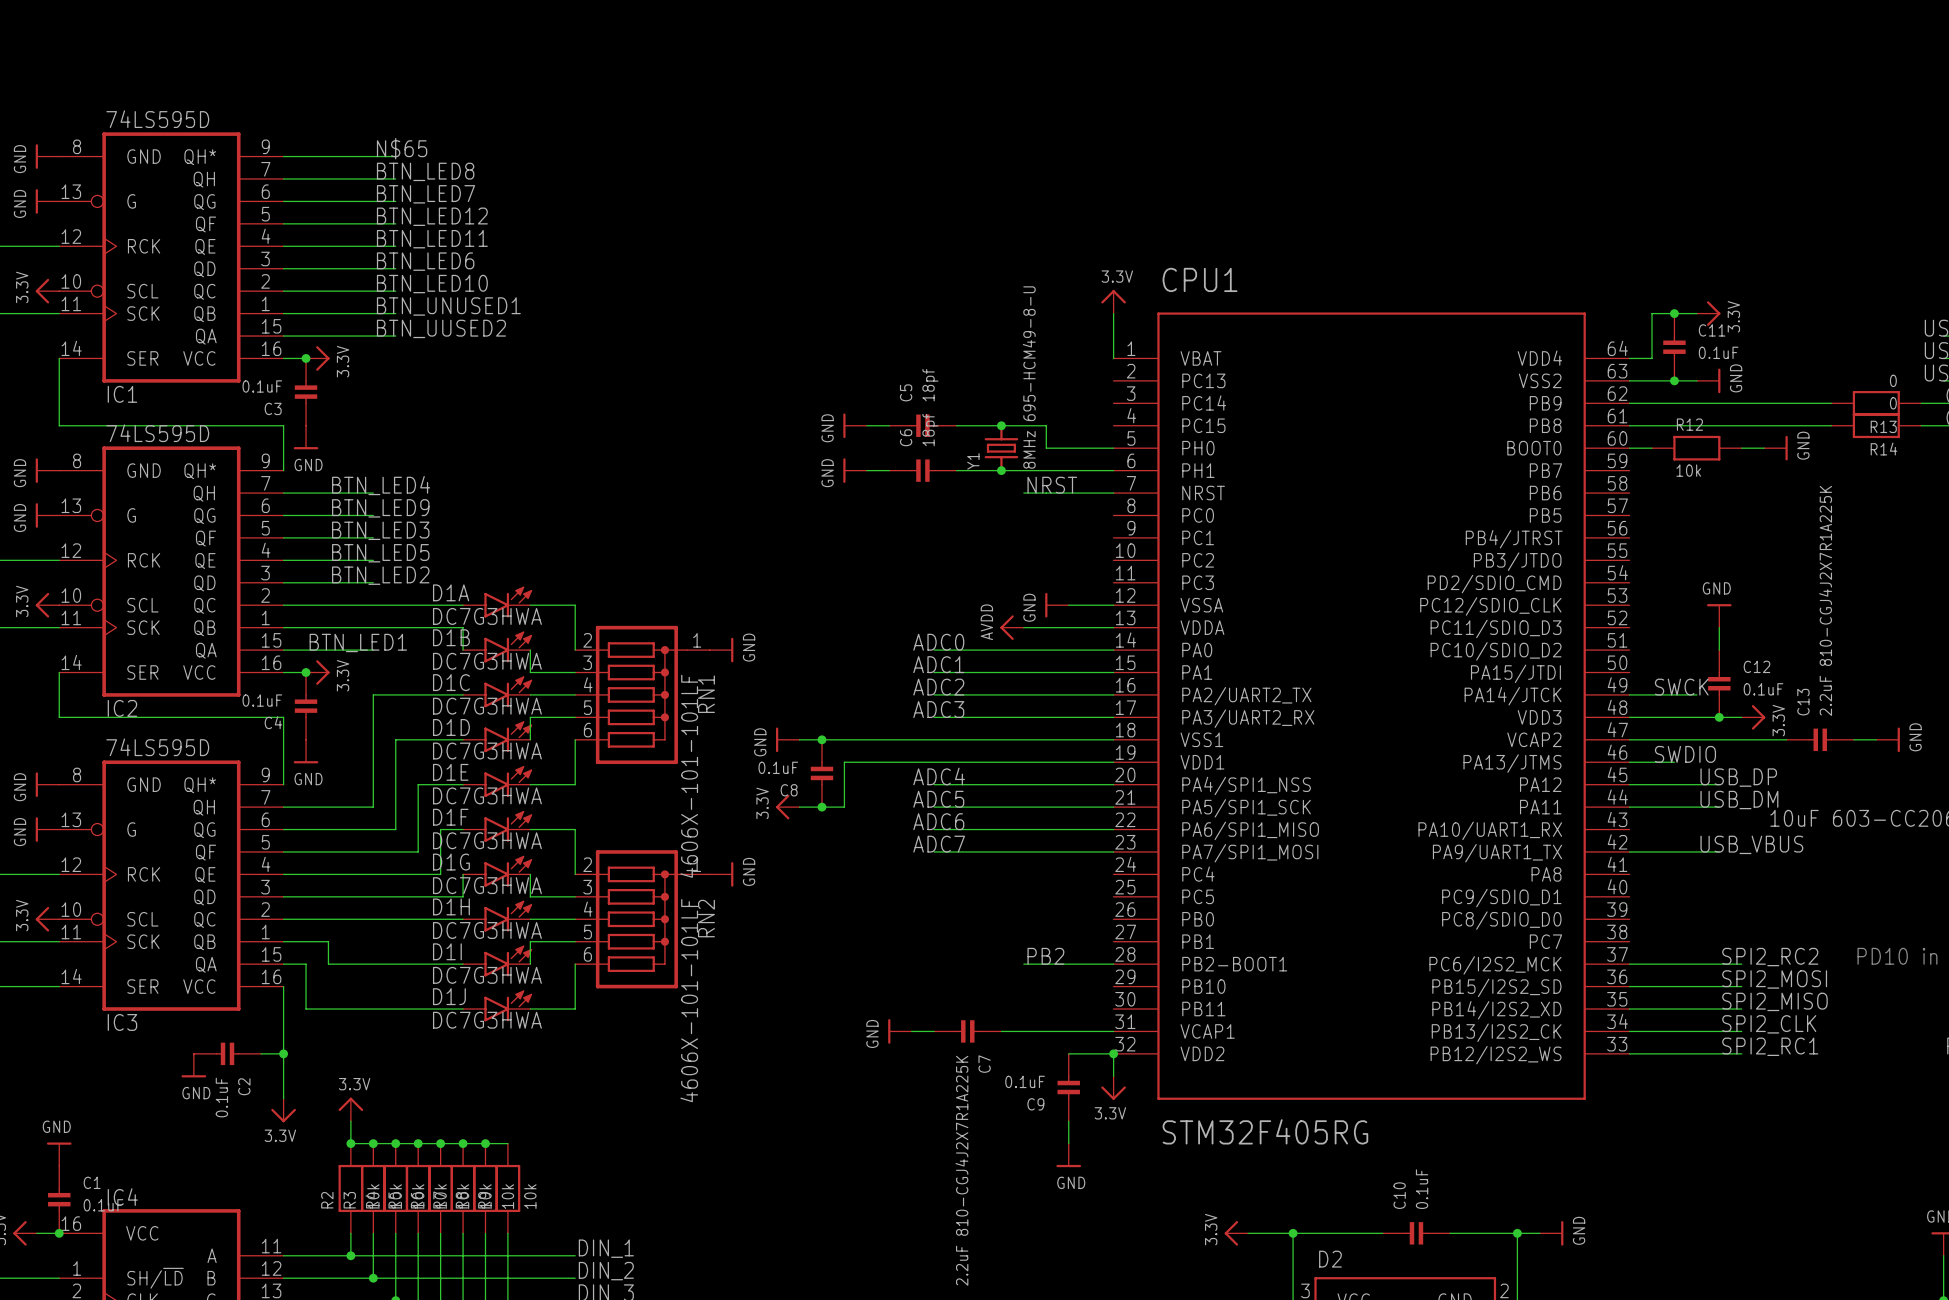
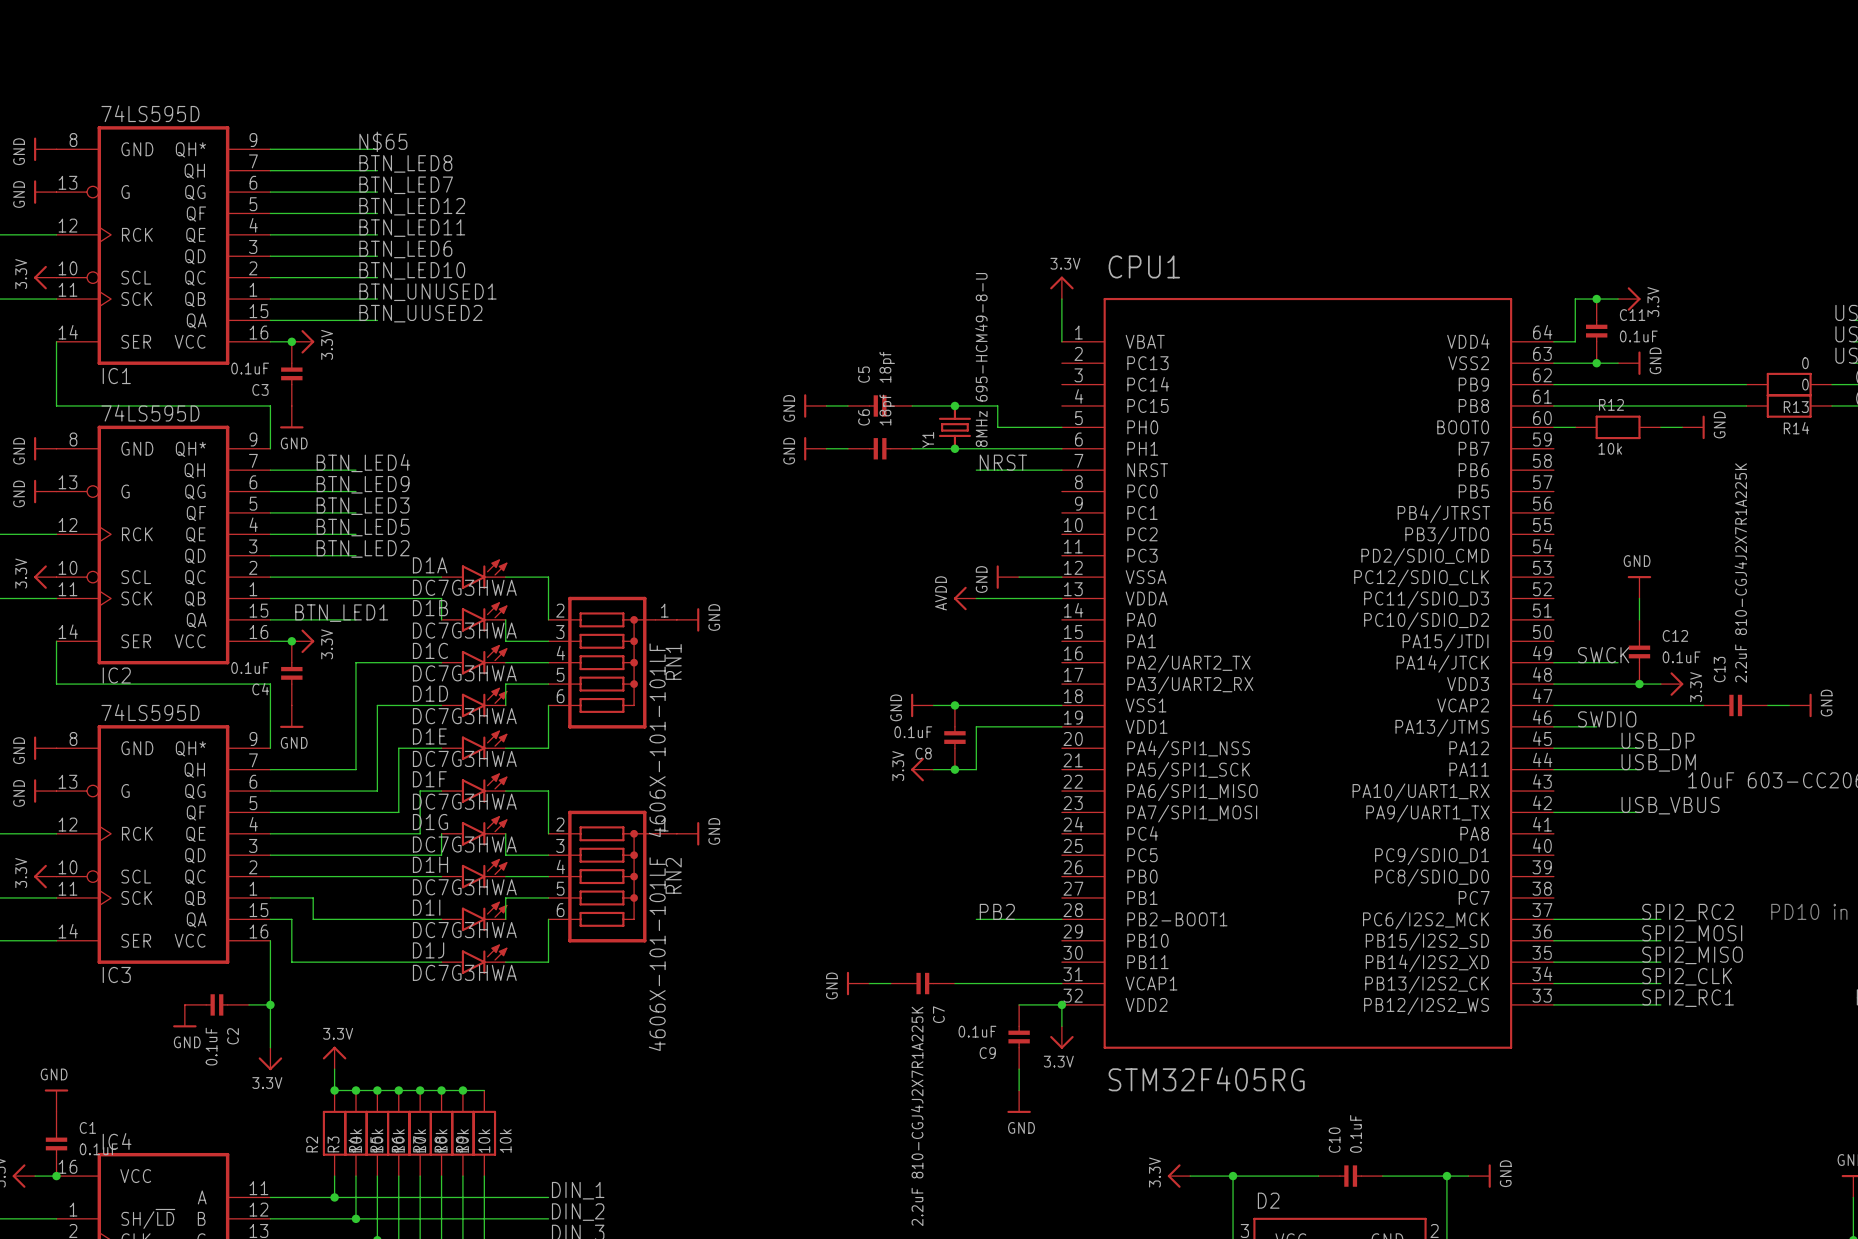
label: ADC0 (938, 642) -> none
wire: (934, 650) (1113, 650) -> none
label: ADC1 (938, 664) -> none
wire: (934, 672) (1113, 672) -> none
label: ADC2 (938, 687) -> none
wire: (934, 694) (1113, 694) -> none
label: ADC3 (938, 709) -> none
wire: (934, 717) (1113, 717) -> none
power symbol position: GND (787, 739) -> GND (922, 705)
wire: (799, 739) (979, 739) -> none
junction: (821, 739) -> none
junction: none -> (954, 705)
wire: (1023, 762) (844, 762) (844, 807) (799, 807) -> none
C8 position: (821, 773) -> (954, 737)
label: ADC4 (939, 776) -> none
wire: (934, 784) (1113, 784) -> none
label: ADC5 (938, 799) -> none
power symbol position: 3.3V (787, 807) -> 3.3V (922, 769)
junction: (821, 807) -> none
junction: none -> (954, 769)
wire: (1023, 807) (1113, 807) -> (976, 769) (976, 726)
label: ADC6 (938, 821) -> none
wire: (934, 829) (1113, 829) -> none
label: ADC7 (939, 844) -> none
wire: (934, 851) (1113, 851) -> none

